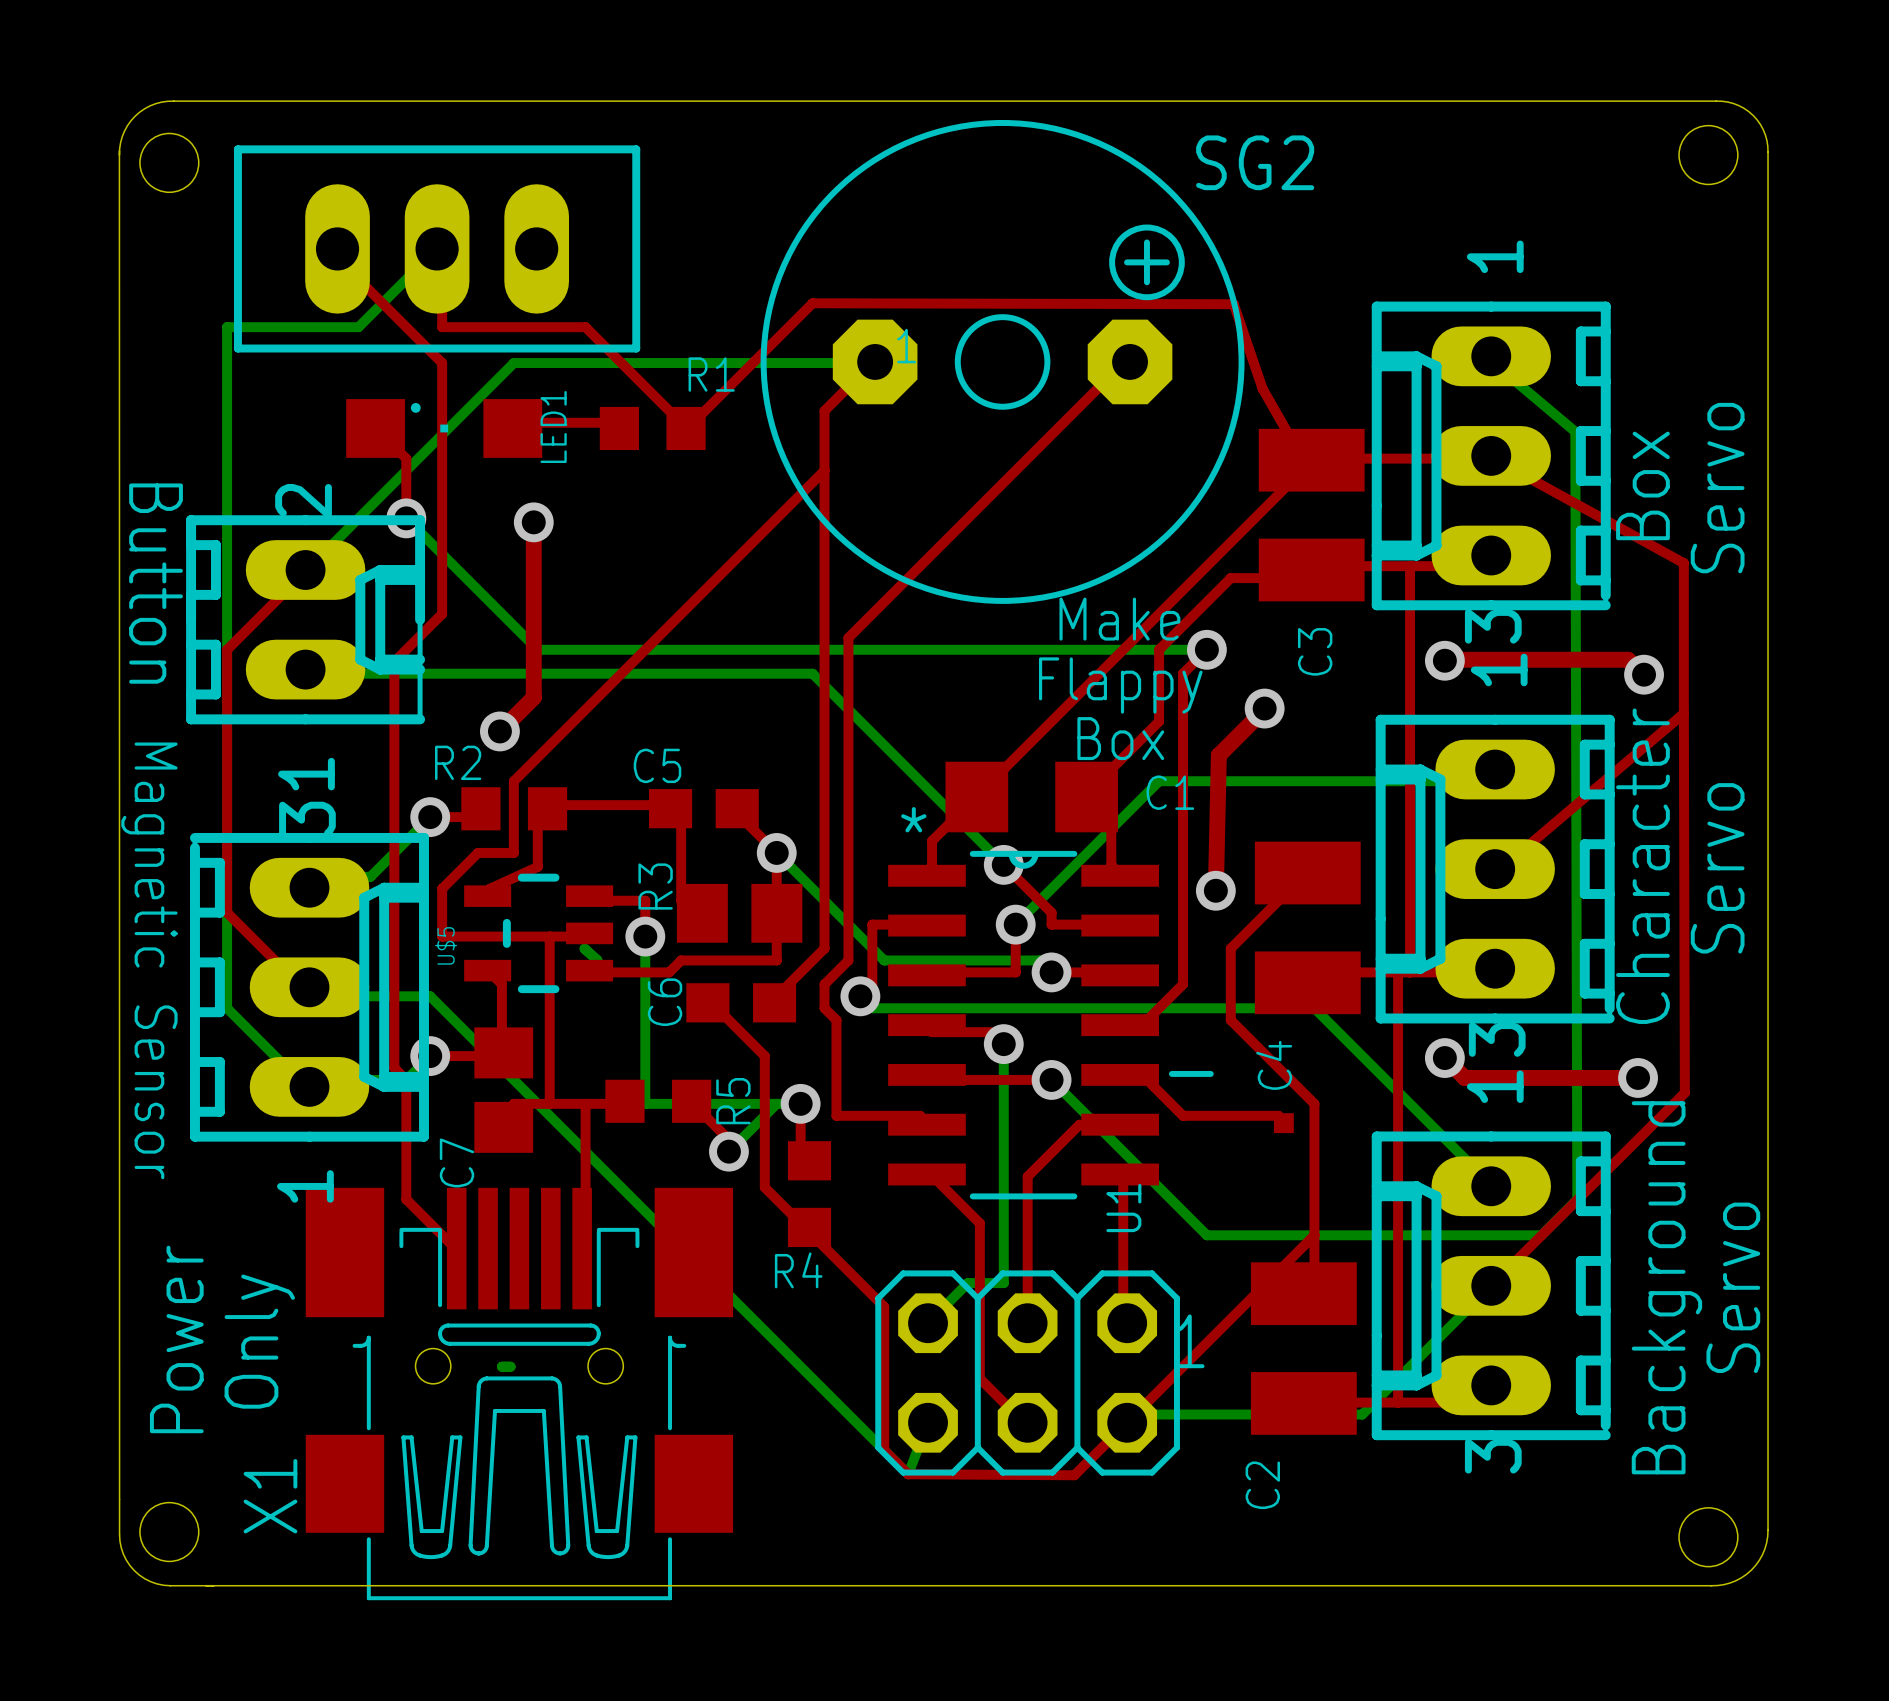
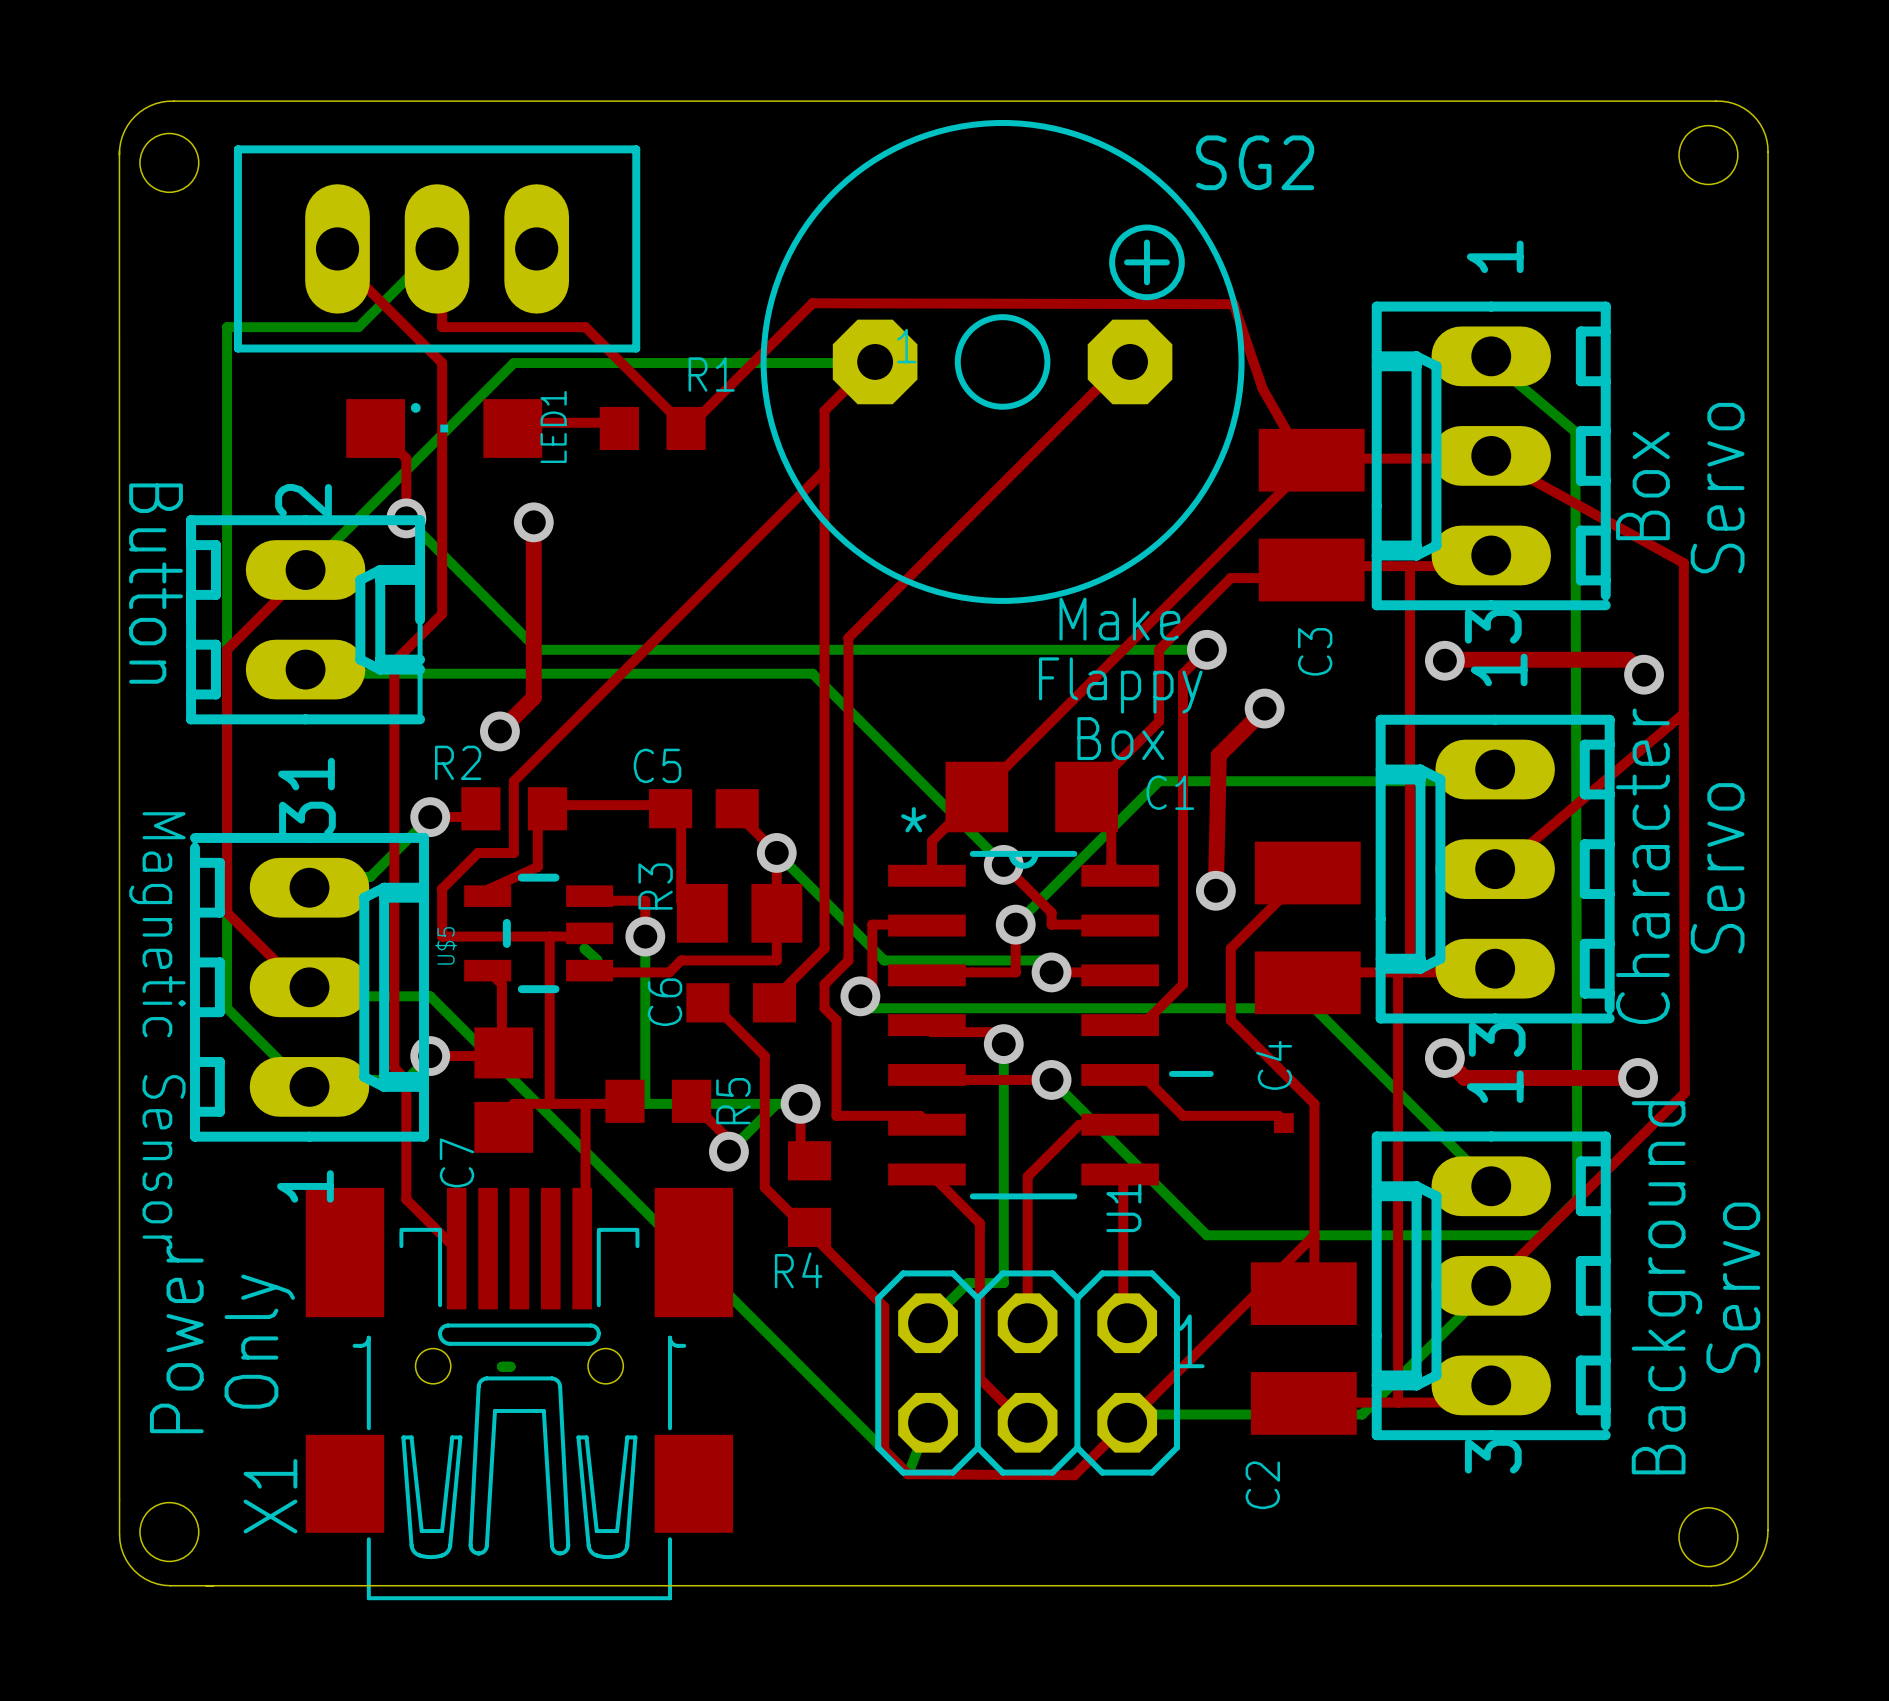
text position: Magnetic Sensor (149, 960) -> Magnetic Sensor (157, 1030)

